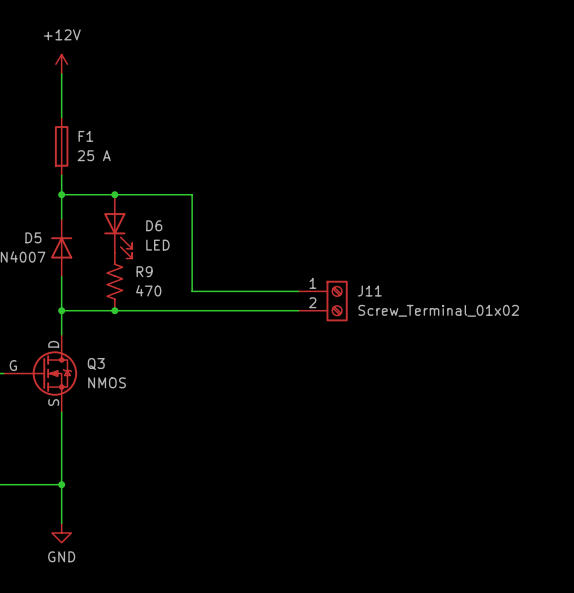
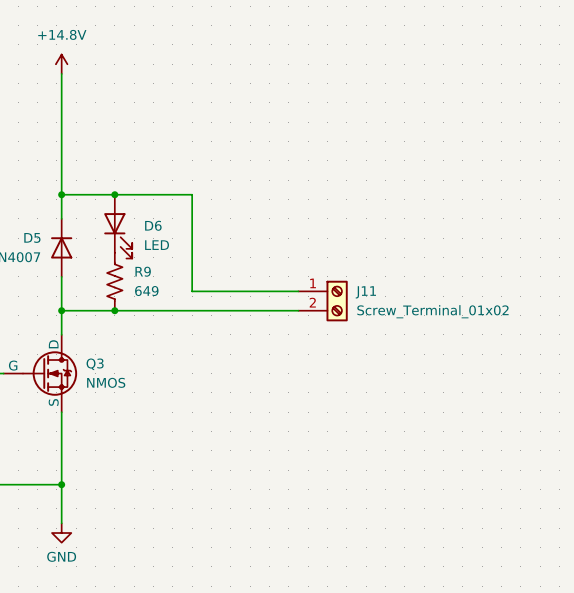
power symbol: +12V (61, 64) -> +14.8V (61, 64)
F1: 25 A (61, 146) -> none
R9 value: 470 (148, 290) -> 649 (146, 291)

